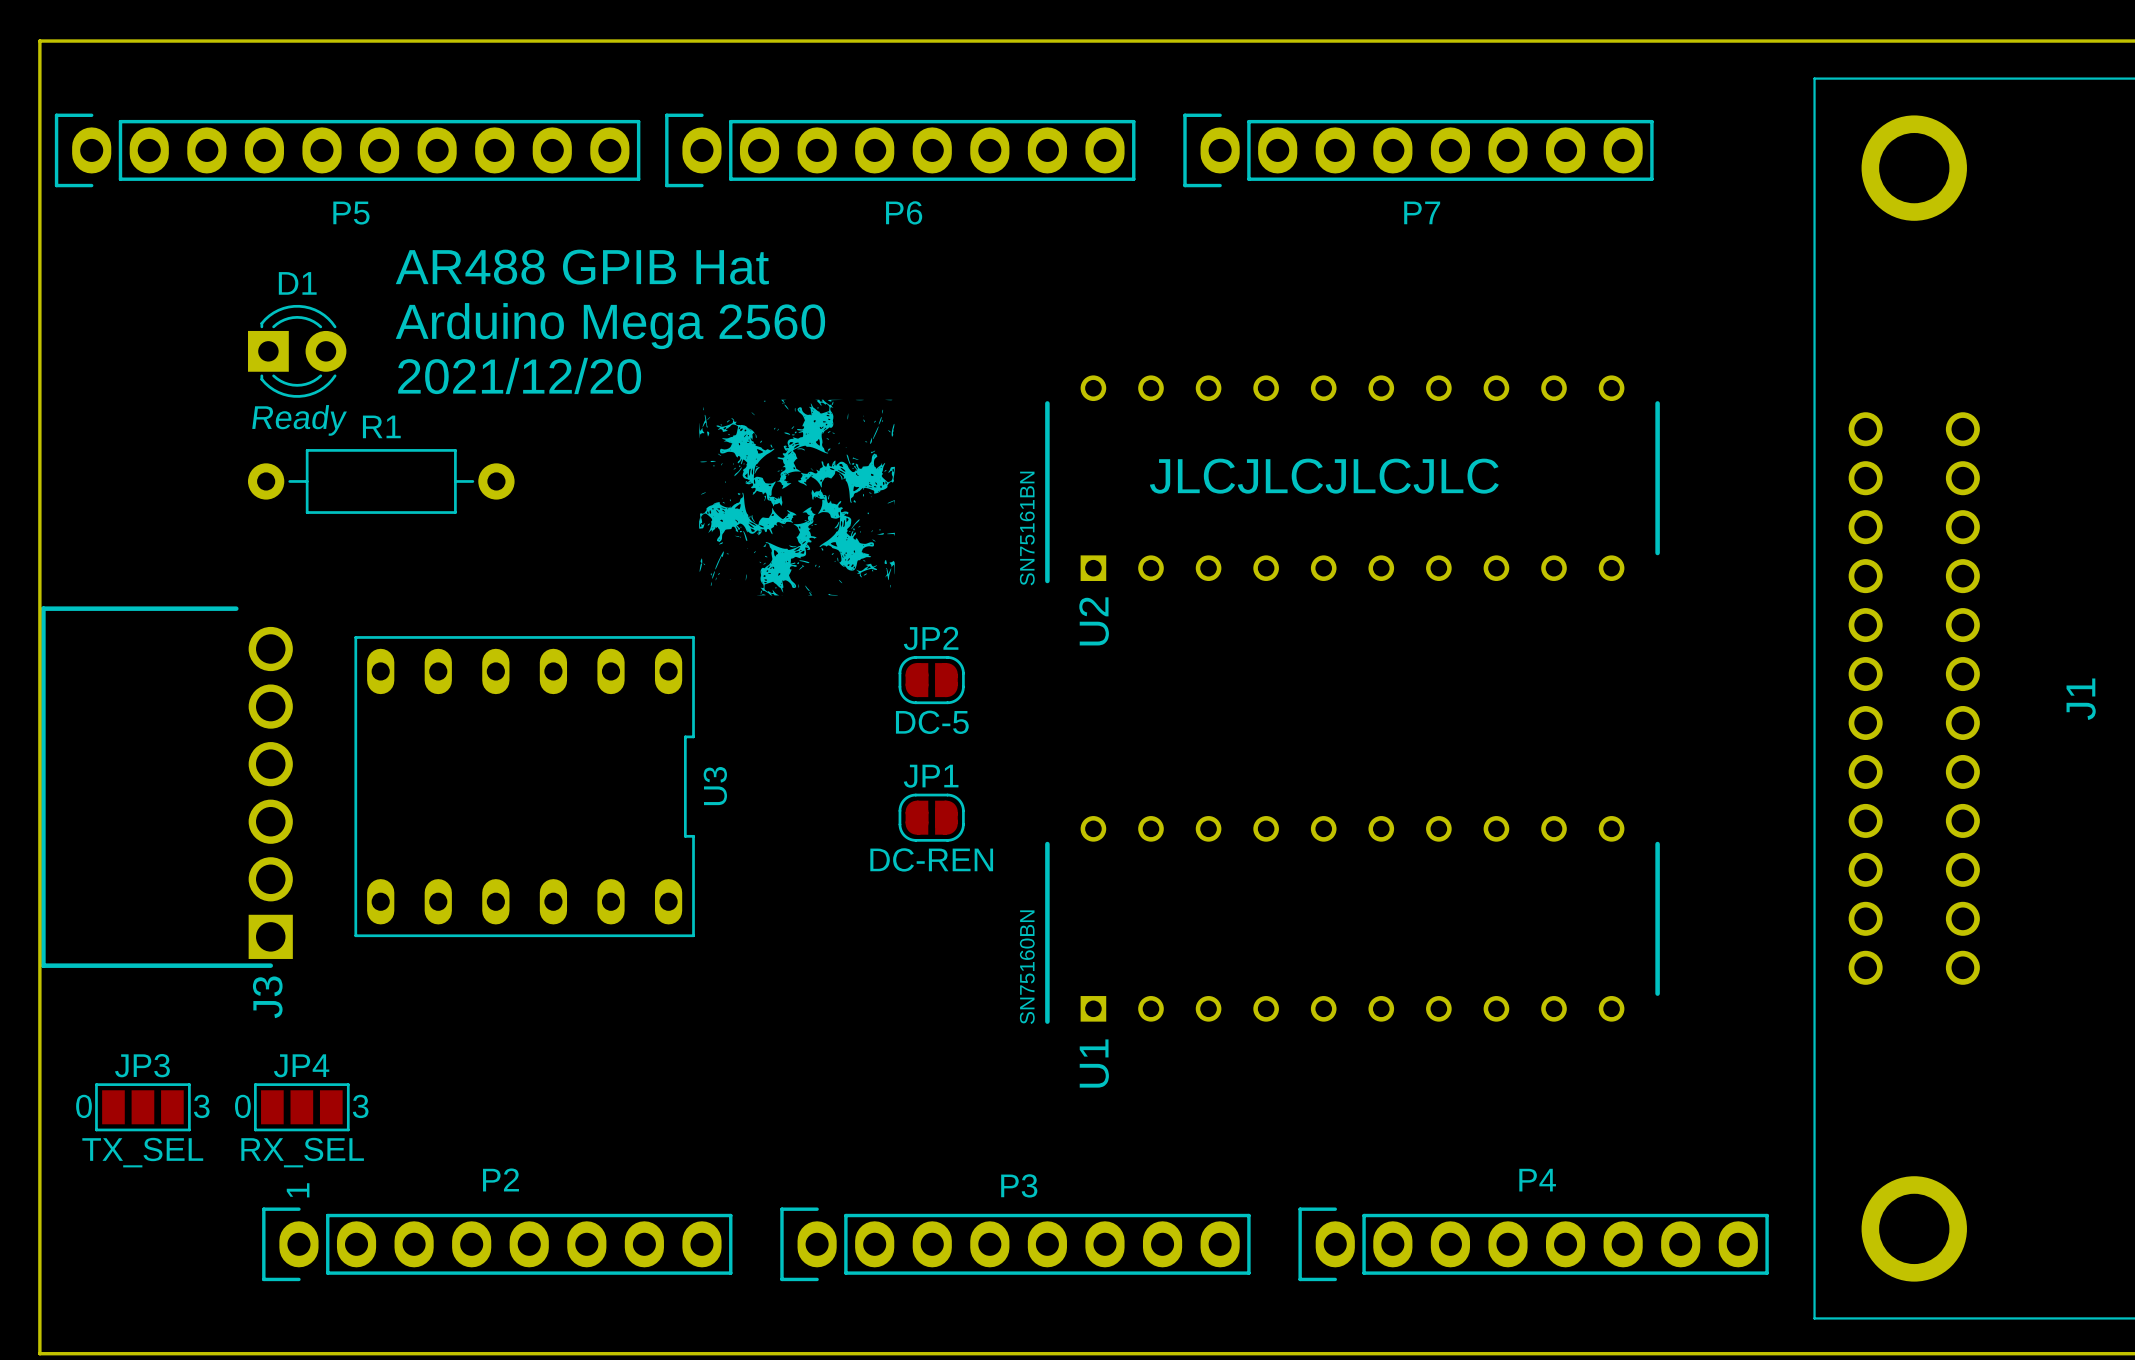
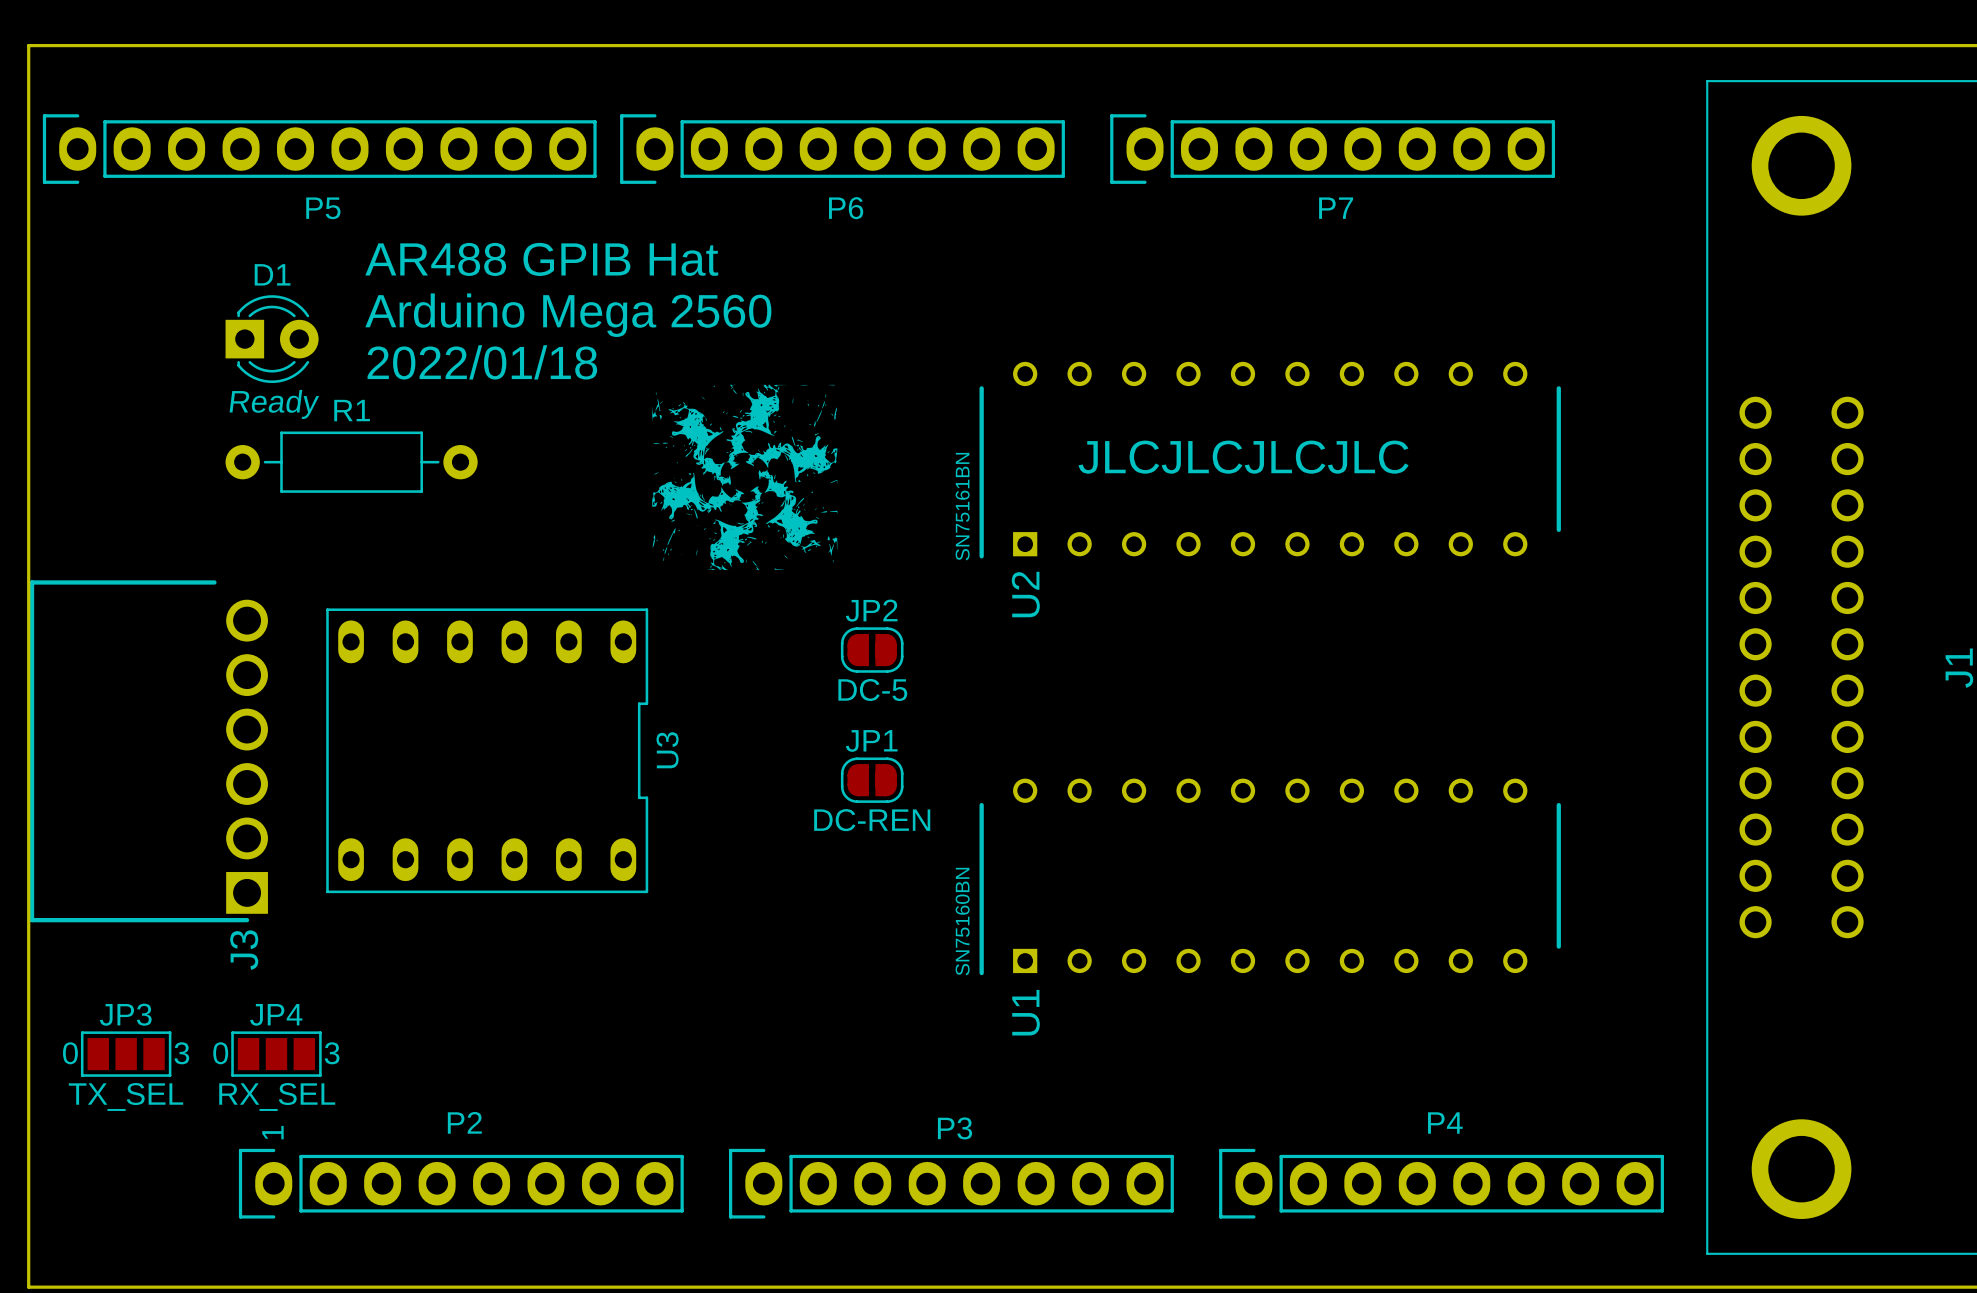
text: 2021/12/20 (519, 375) -> 2022/01/18 (482, 362)

